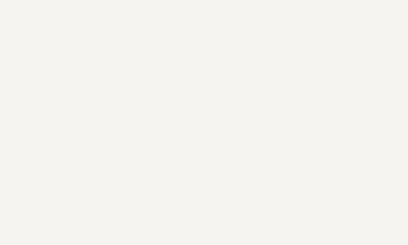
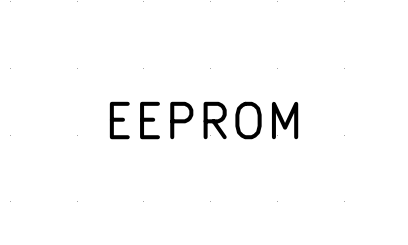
text: none -> EEPROM (204, 120)

